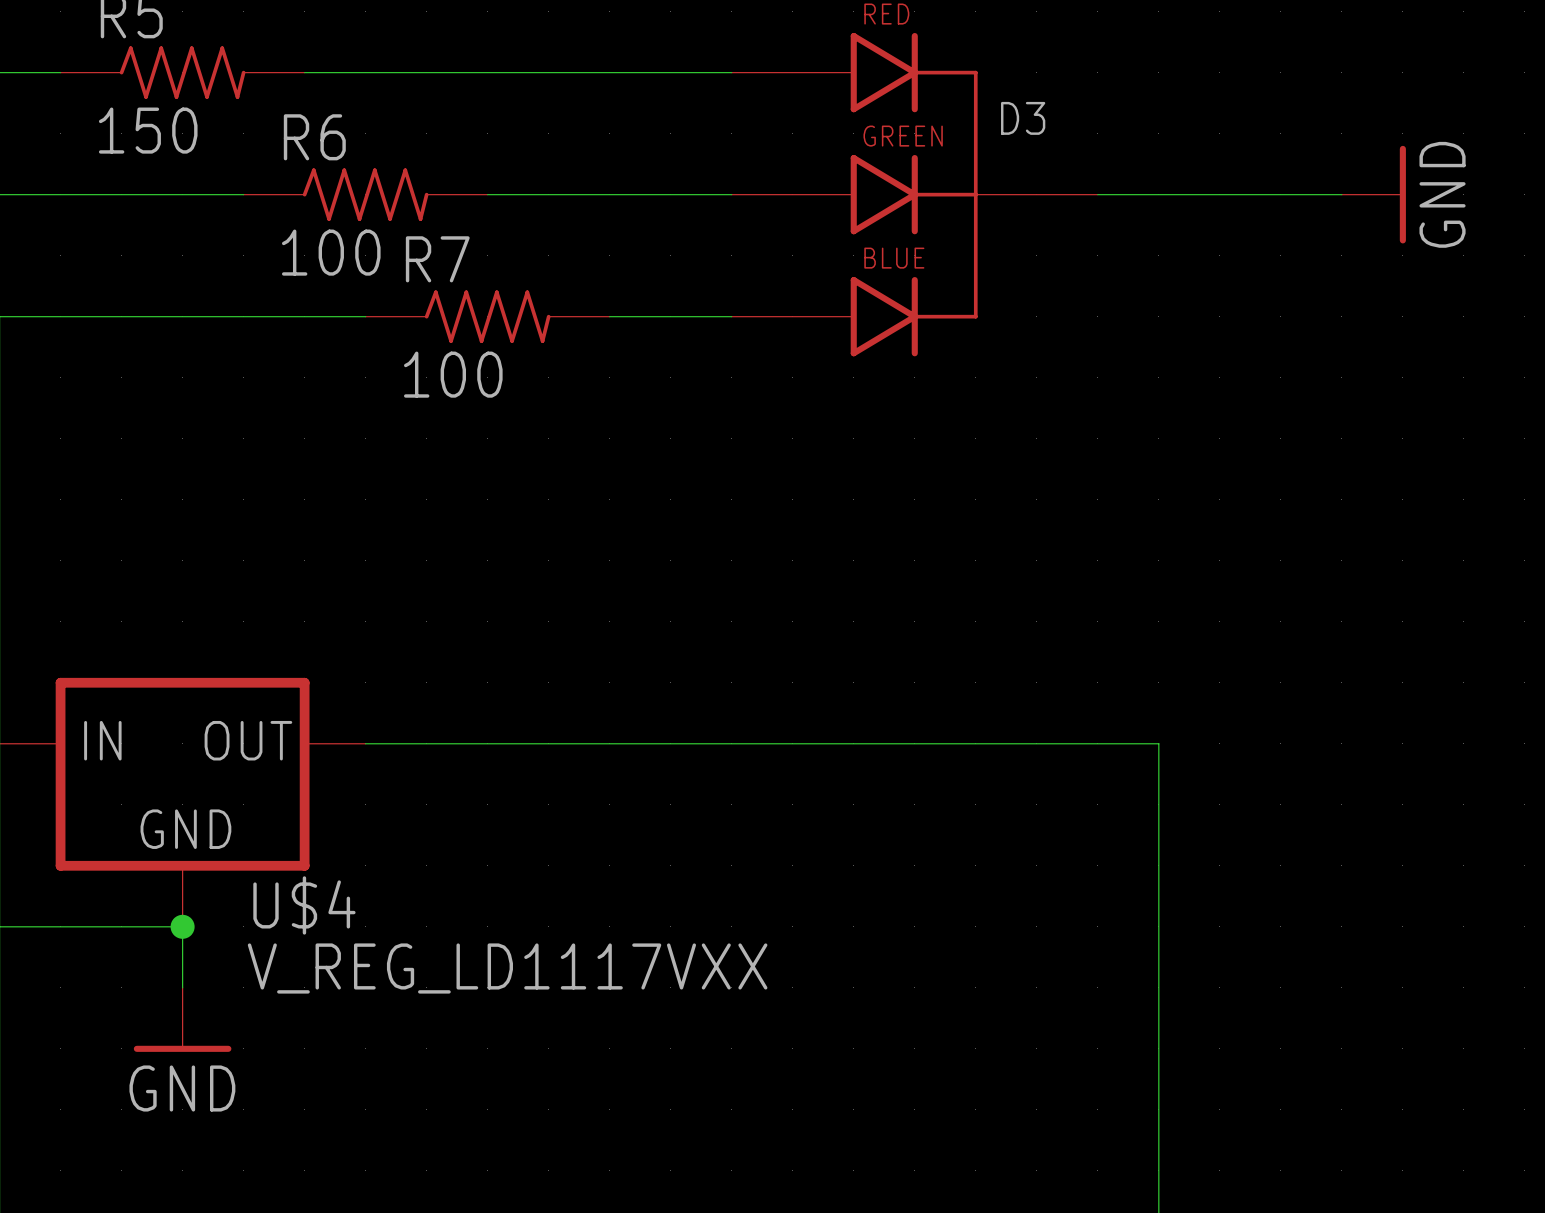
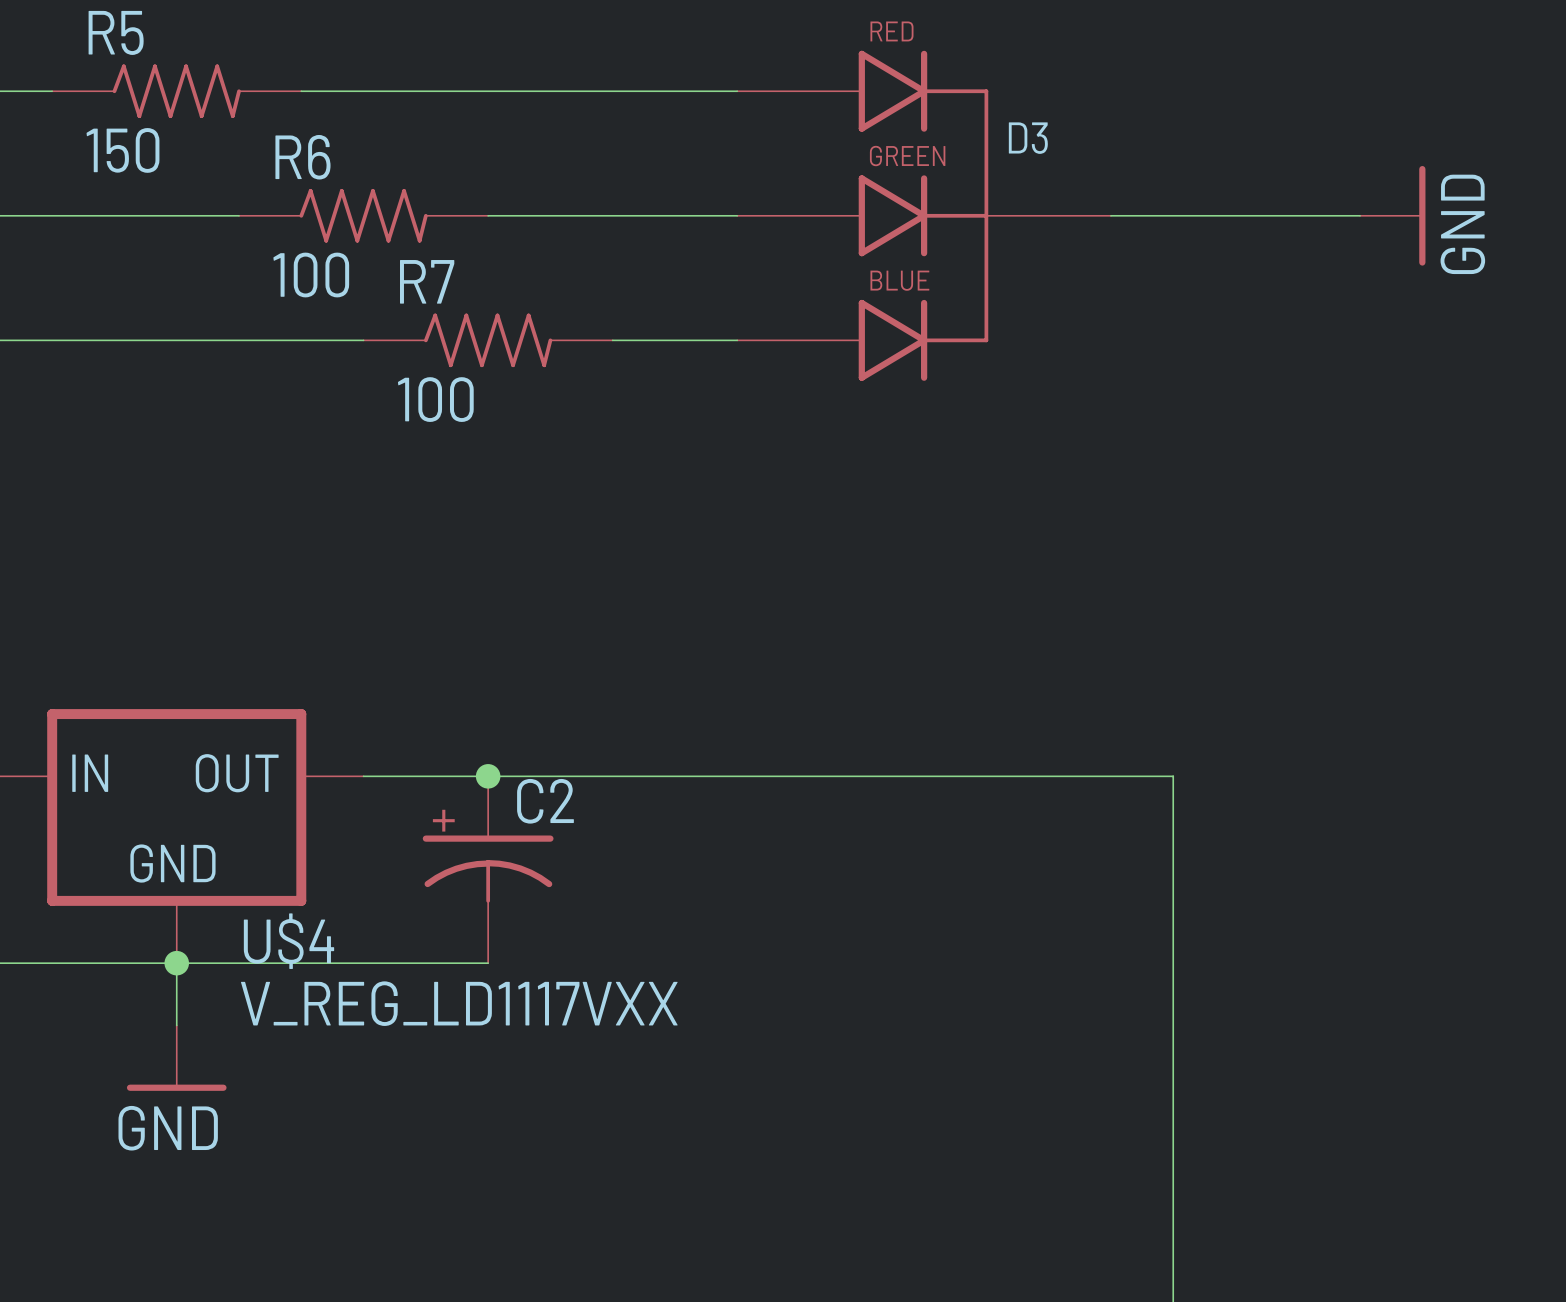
junction: none -> (488, 776)
C2: none -> (488, 869)
wire: none -> (176, 963) (488, 963)

